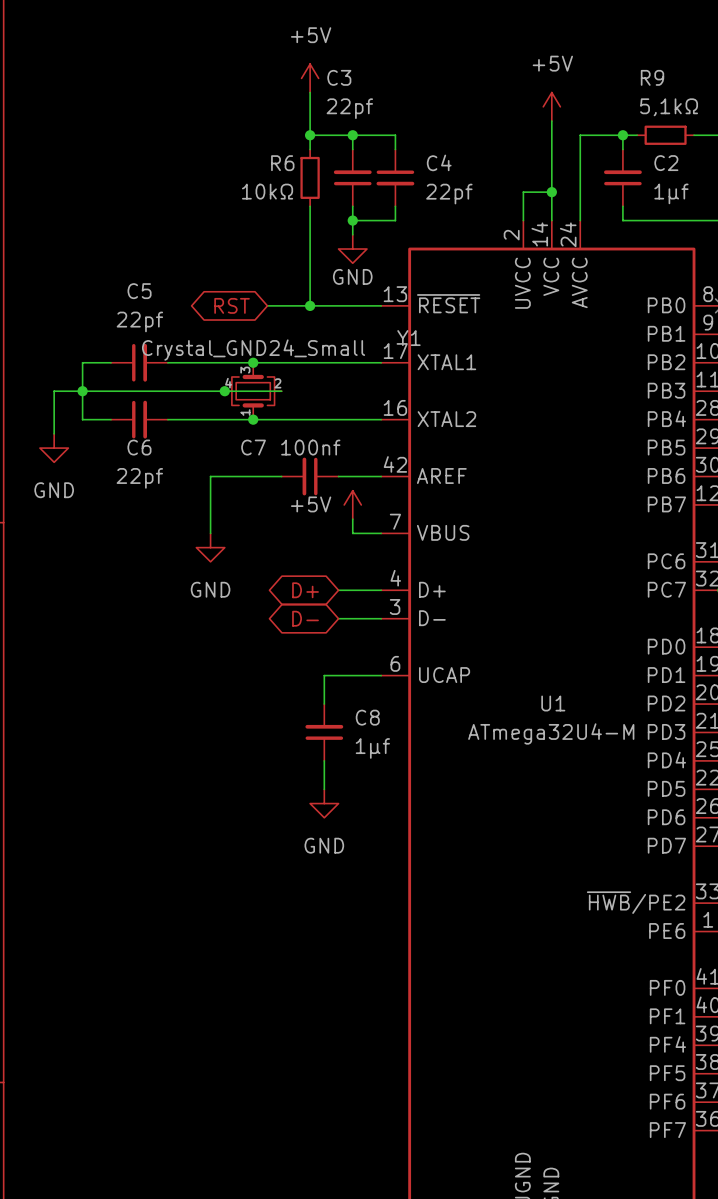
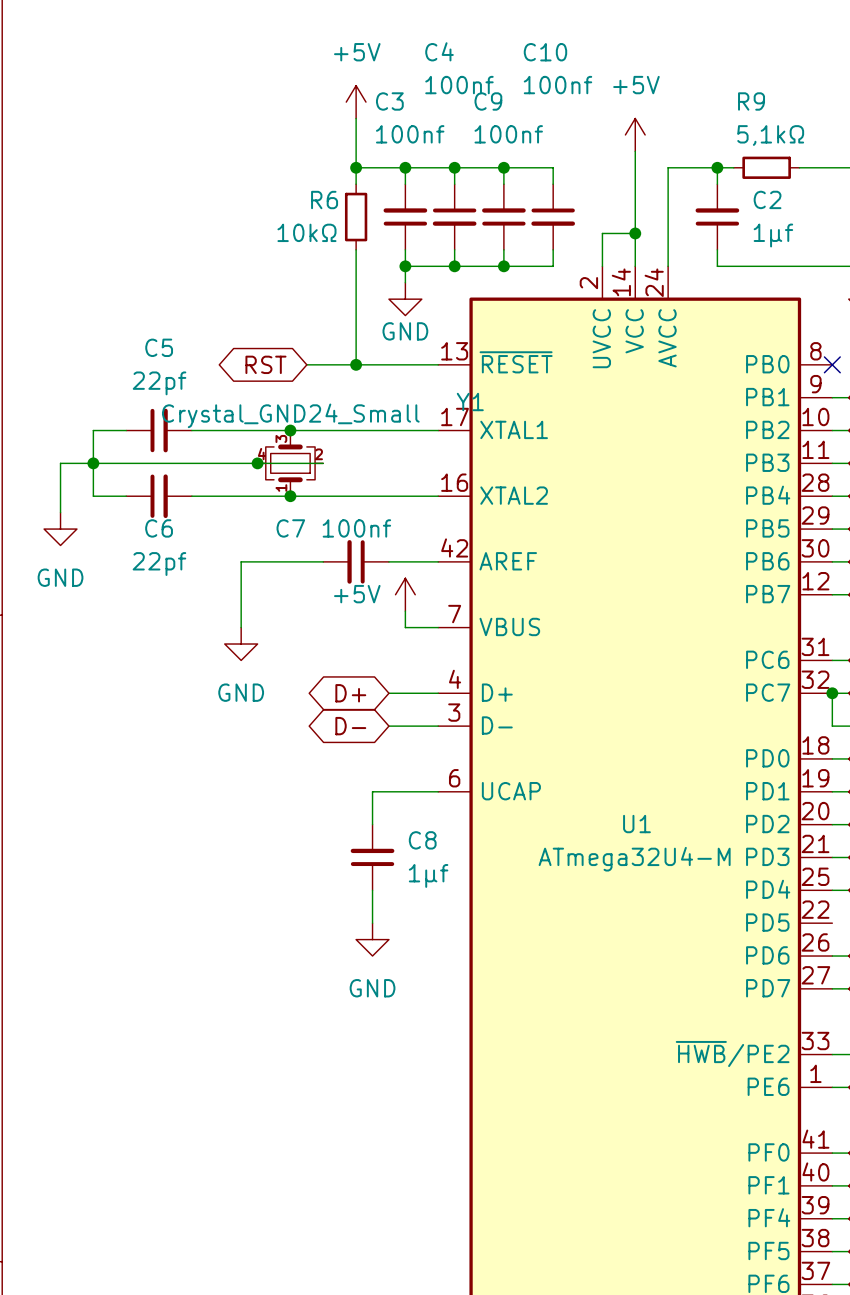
C3 value: 22pf (349, 108) -> 100nf (410, 134)
wire: none -> (454, 167) (553, 167) (553, 184)
junction: none -> (454, 167)
wire: none -> (503, 167) (503, 184)
junction: none -> (503, 167)
C4 name position: C4 (439, 162) -> C4 (439, 51)
C9: none -> 100nf (503, 217)
C10: none -> 100nf (553, 217)
C4 value: 22pf (449, 194) -> 100nf (459, 85)
wire: none -> (503, 249) (503, 266)
wire: none -> (553, 249) (553, 266) (454, 266)
junction: none -> (454, 266)
junction: none -> (503, 266)

